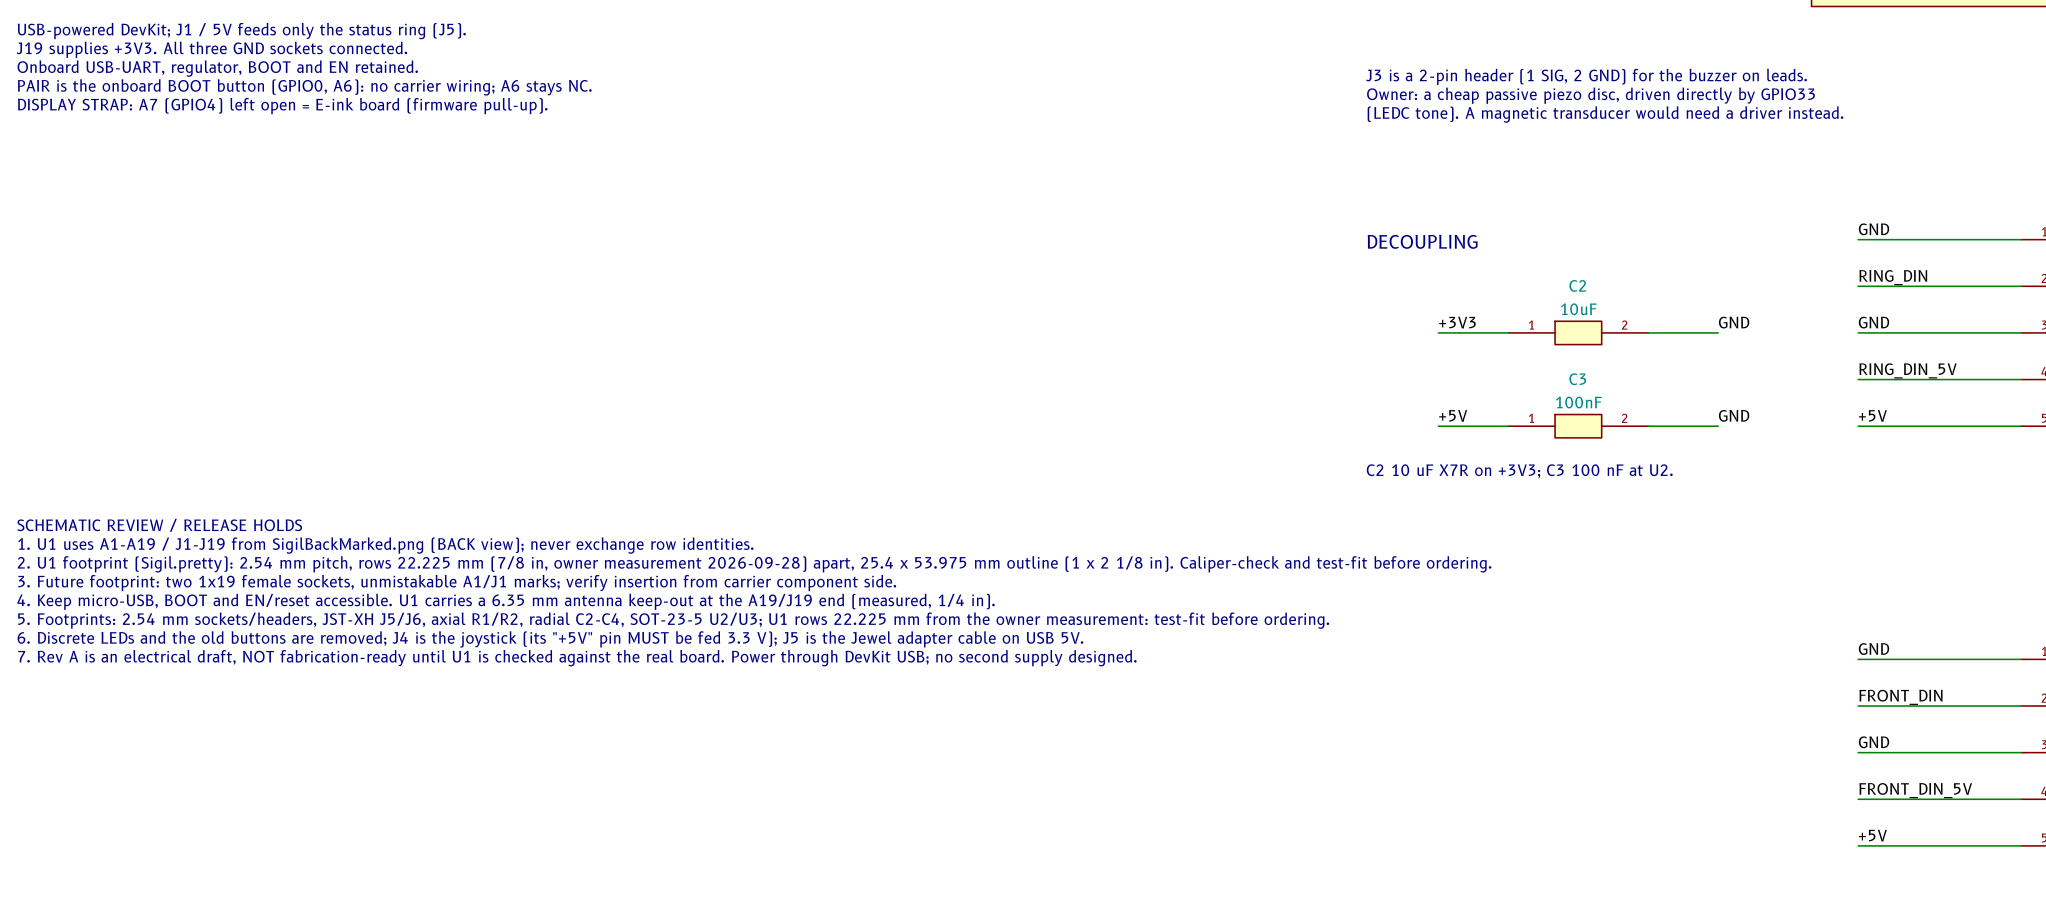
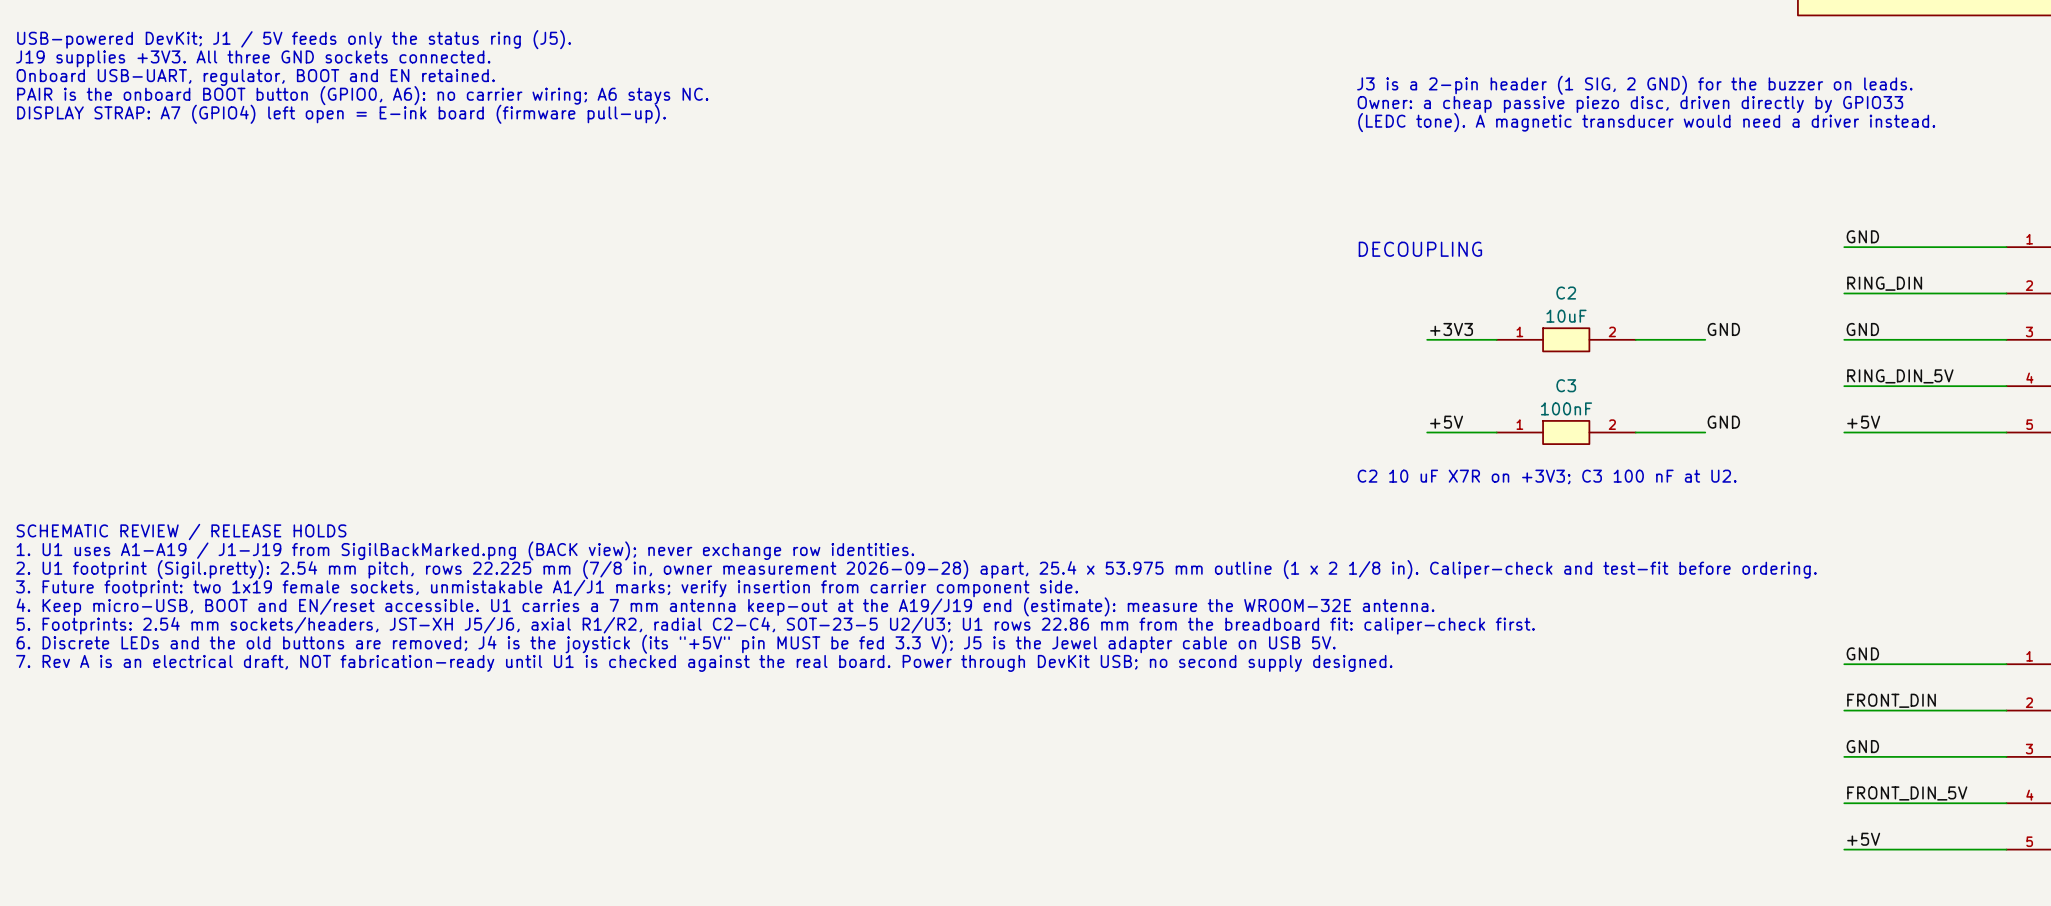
text: 4. Keep micro-USB, BOOT and EN/reset accessible. U1 carries a 6.35 mm antenna keep-out at the A19/J19 end (measured, 1/4 in). (506, 601) -> 4. Keep micro-USB, BOOT and EN/reset accessible. U1 carries a 7 mm antenna keep-out at the A19/J19 end (estimate): measure the WROOM-32E antenna. (725, 606)
text: 5. Footprints: 2.54 mm sockets/headers, JST-XH J5/J6, axial R1/R2, radial C2-C4, SOT-23-5 U2/U3; U1 rows 22.225 mm from the owner measurement: test-fit before ordering. (673, 620) -> 5. Footprints: 2.54 mm sockets/headers, JST-XH J5/J6, axial R1/R2, radial C2-C4, SOT-23-5 U2/U3; U1 rows 22.86 mm from the breadboard fit: caliper-check first. (775, 625)

